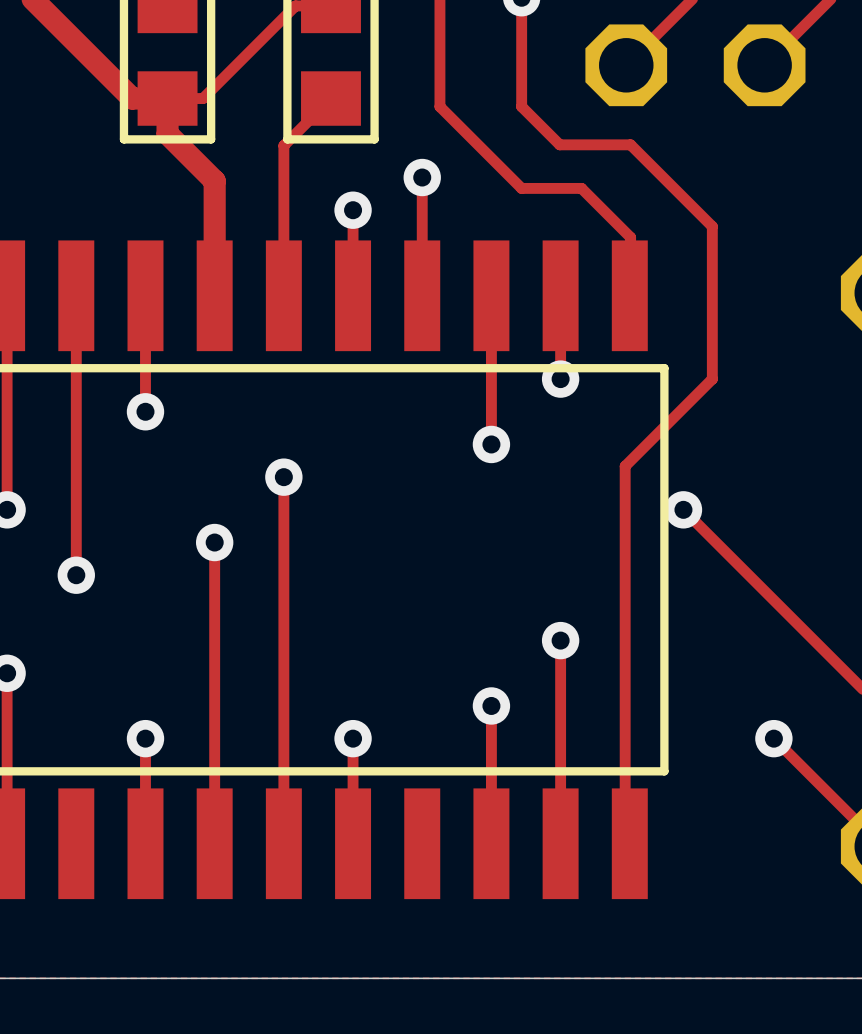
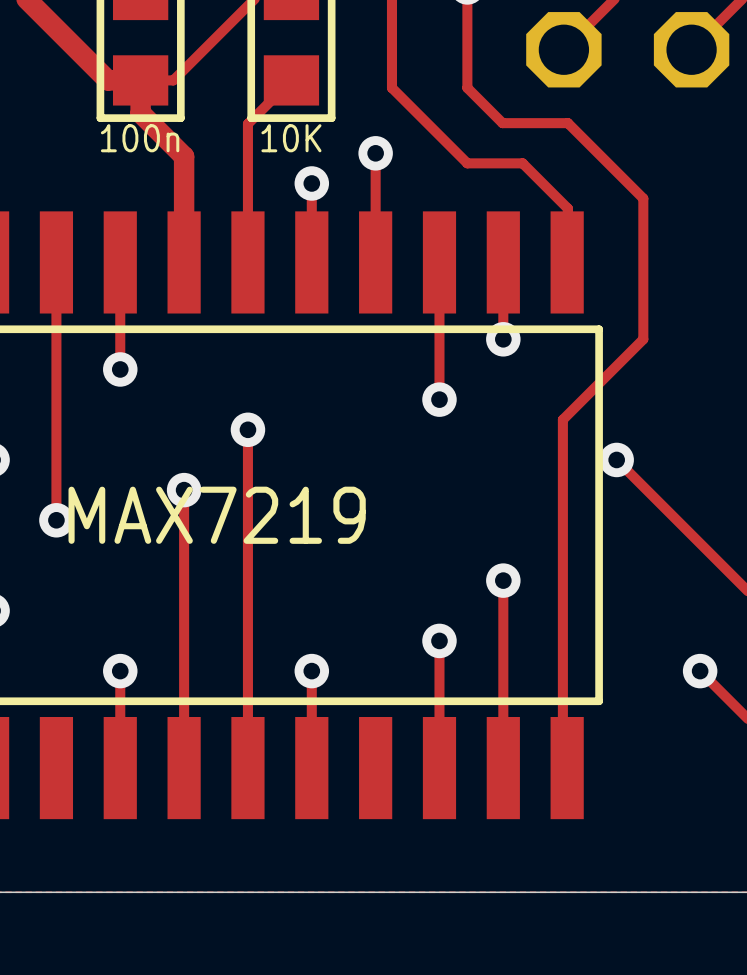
part value: none -> 100n (140, 138)
part value: none -> 10K (291, 138)
part value: none -> MAX7219 (217, 515)

